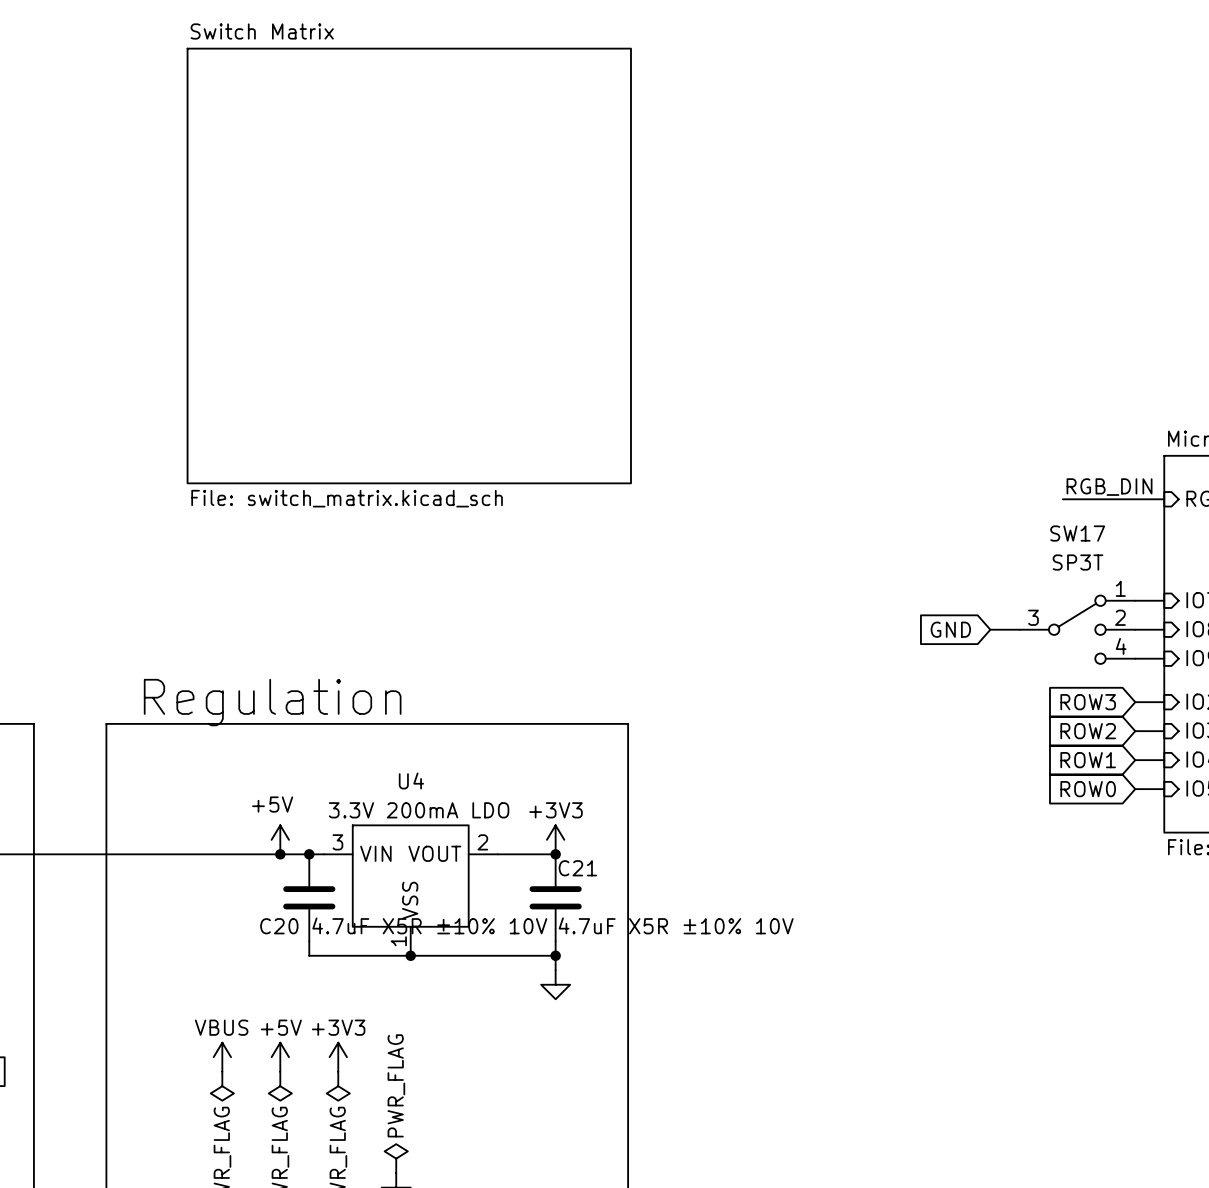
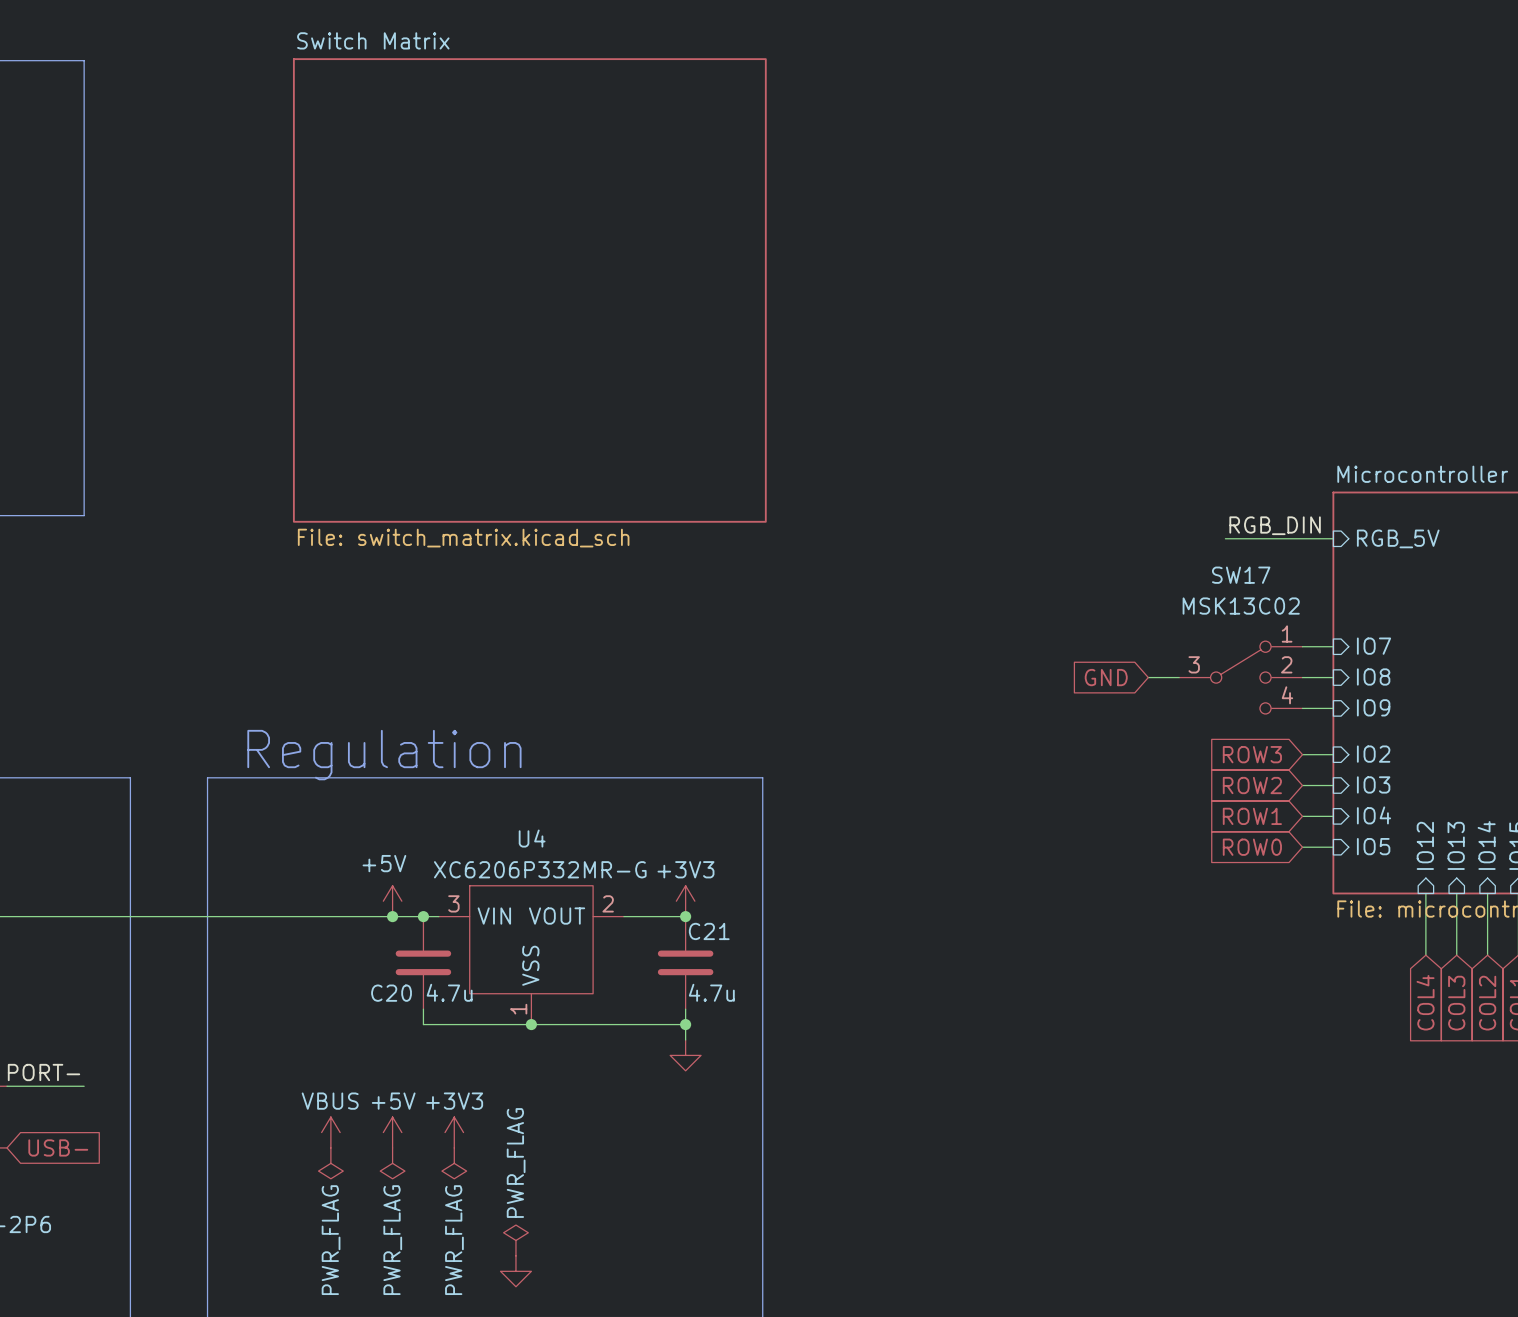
SW17 value: SP3T (1078, 562) -> MSK13C02 (1241, 606)
U4 value: 3.3V 200mA LDO (419, 810) -> XC6206P332MR-G (540, 869)
C20 value: 4.7uF X5R ±10% 10V (429, 925) -> 4.7u (449, 992)
C21 value: 4.7uF X5R ±10% 10V (676, 925) -> 4.7u (711, 992)

